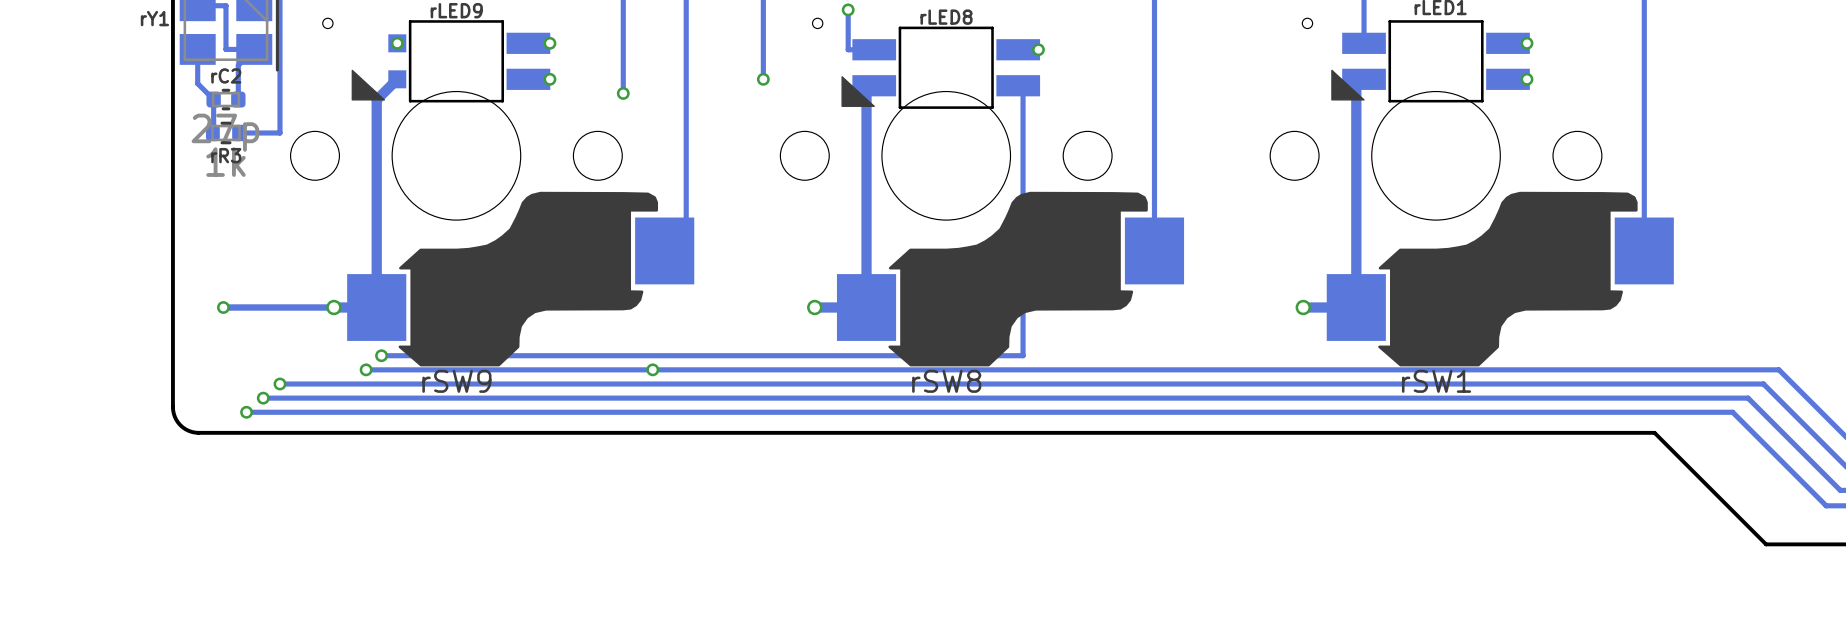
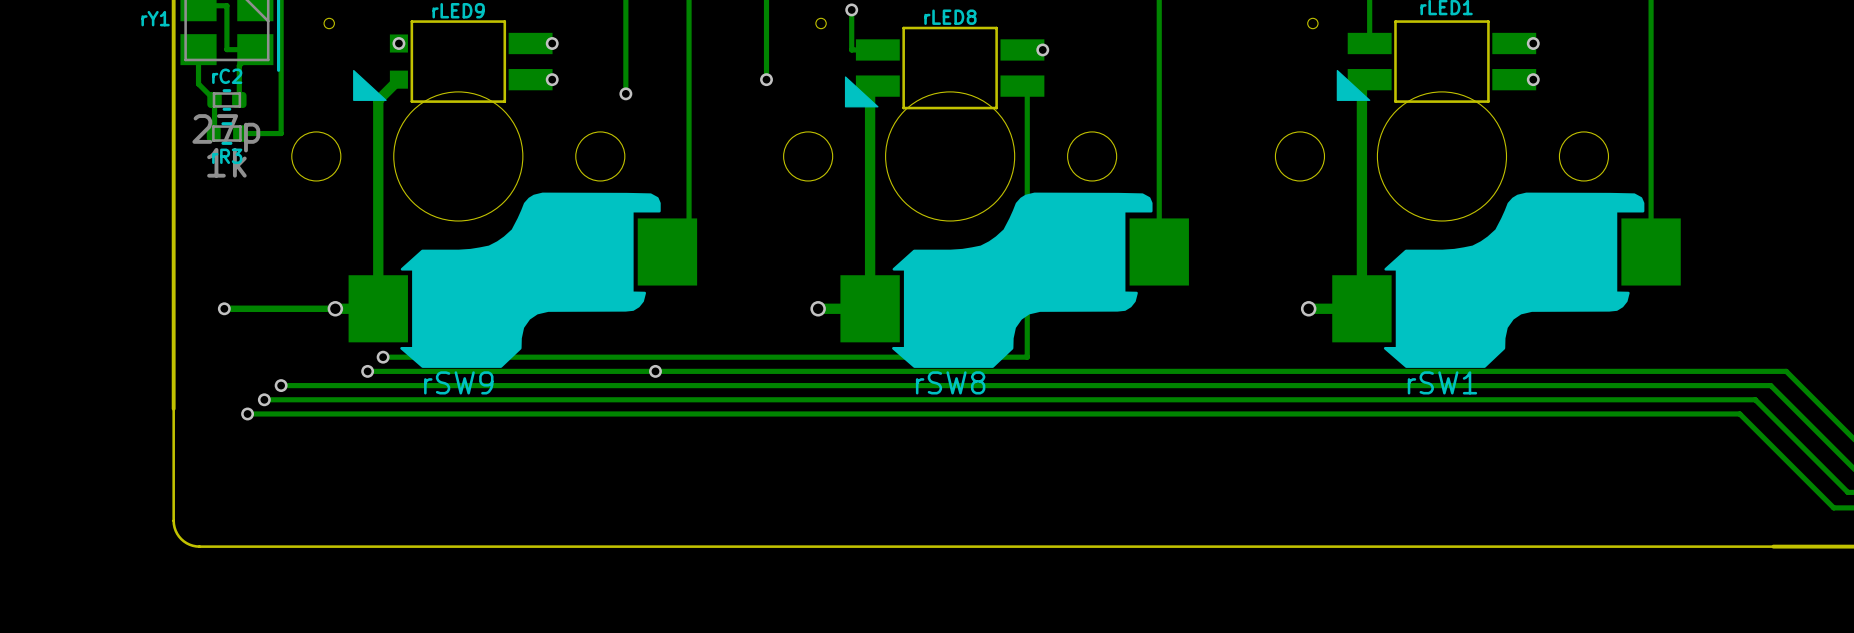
board edge: (172, 407) (174, 416) (180, 425) (188, 430) (198, 432) (1654, 432) (1766, 544) -> (173, 408) (173, 524) (181, 539) (196, 546) (1773, 546)

